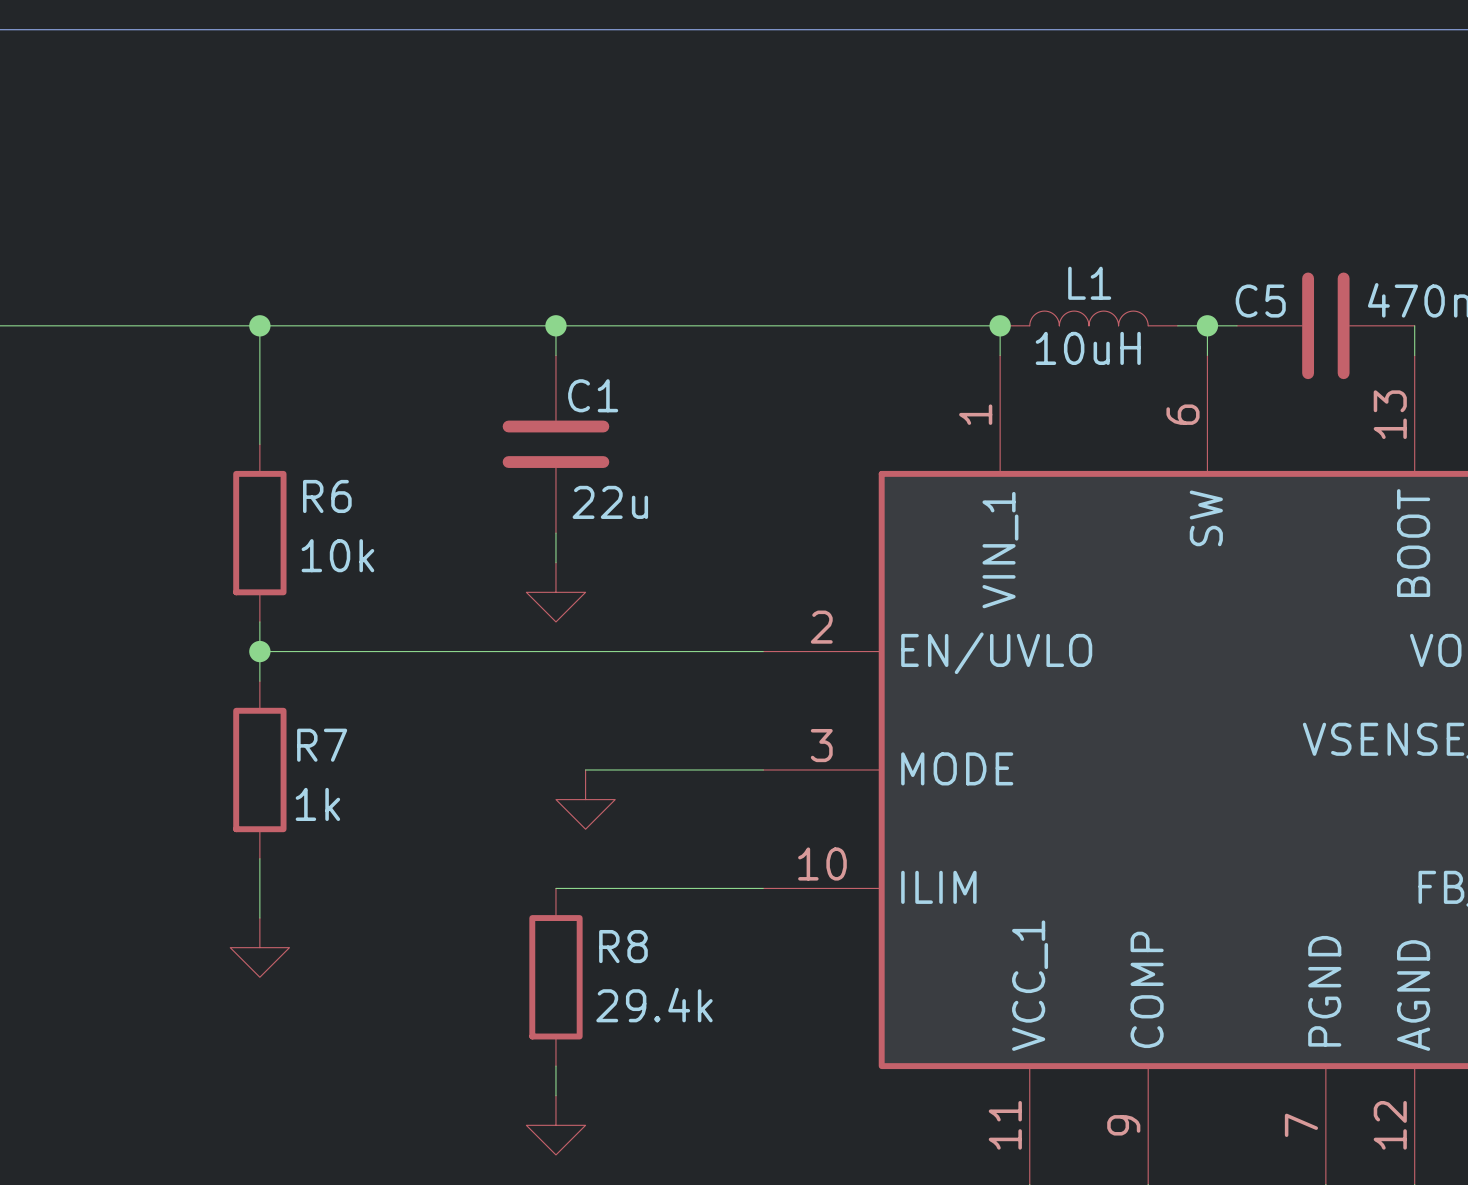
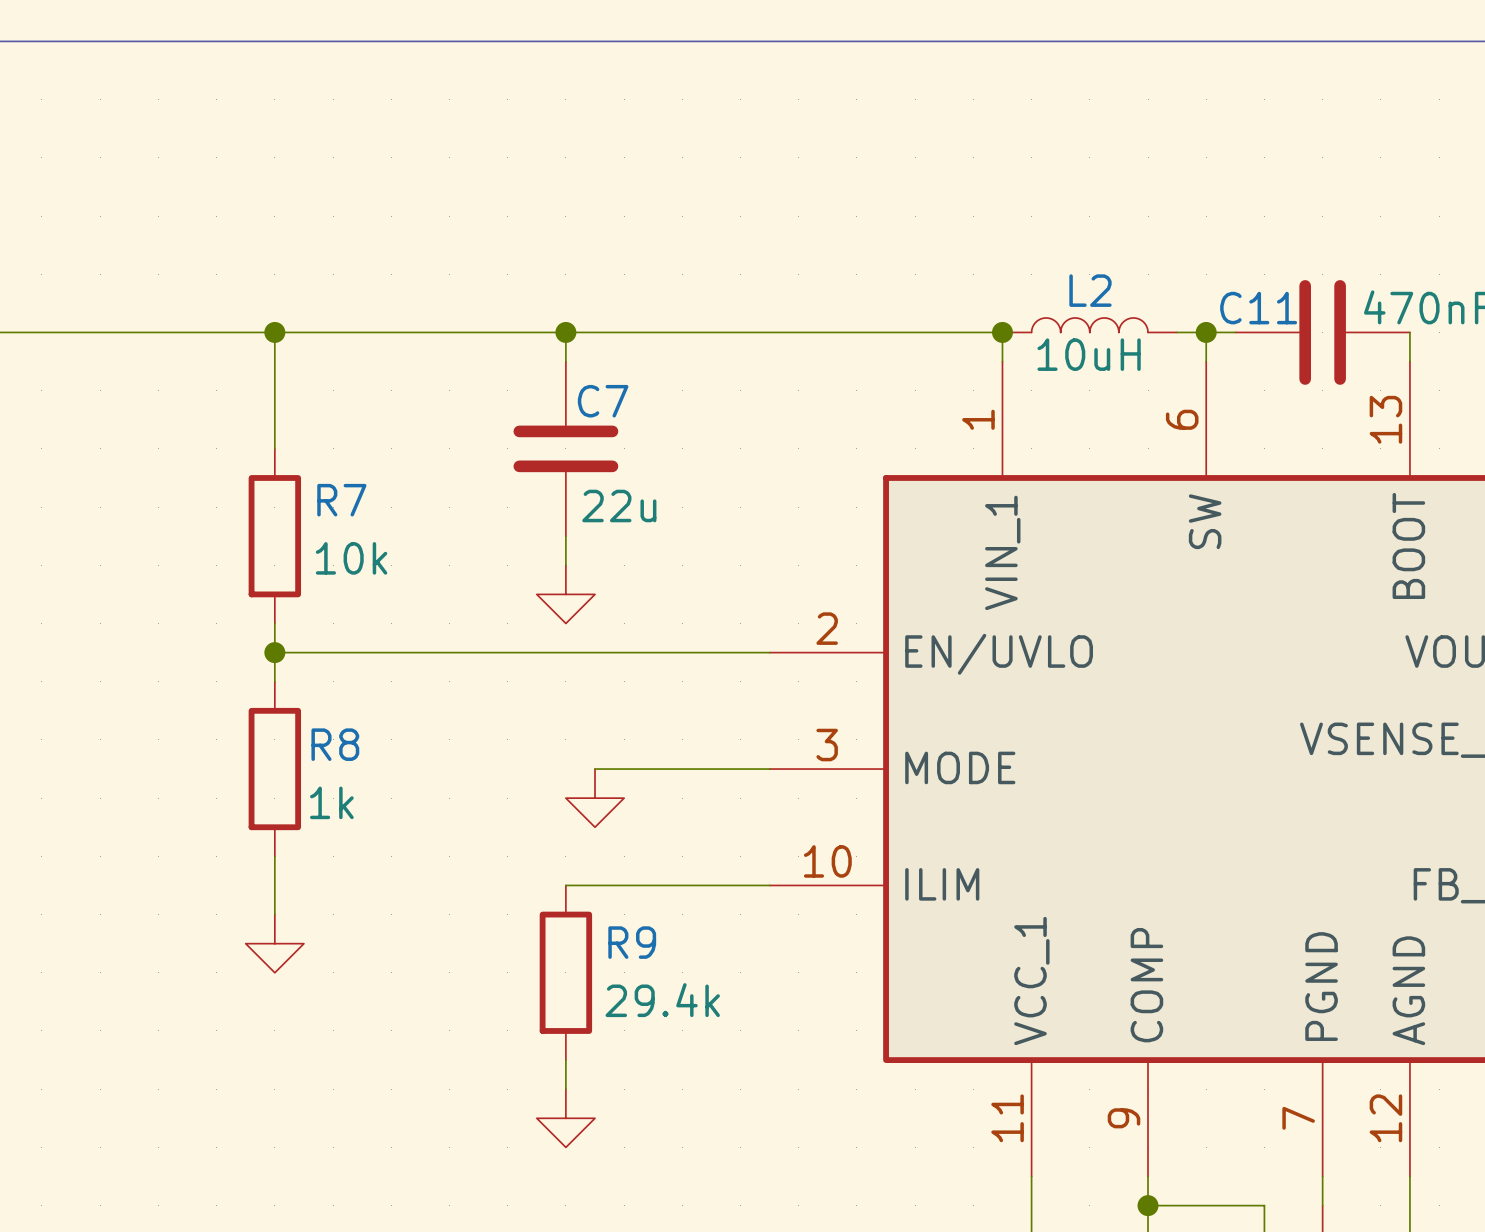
L1 name: L1 (1089, 283) -> L2 (1090, 290)
C5 name: C5 (1260, 301) -> C11 (1258, 308)
C1 name: C1 (593, 395) -> C7 (603, 401)
R6 name: R6 (327, 496) -> R7 (341, 500)
R7 name: R7 (322, 745) -> R8 (335, 744)
R8 name: R8 (623, 946) -> R9 (632, 942)

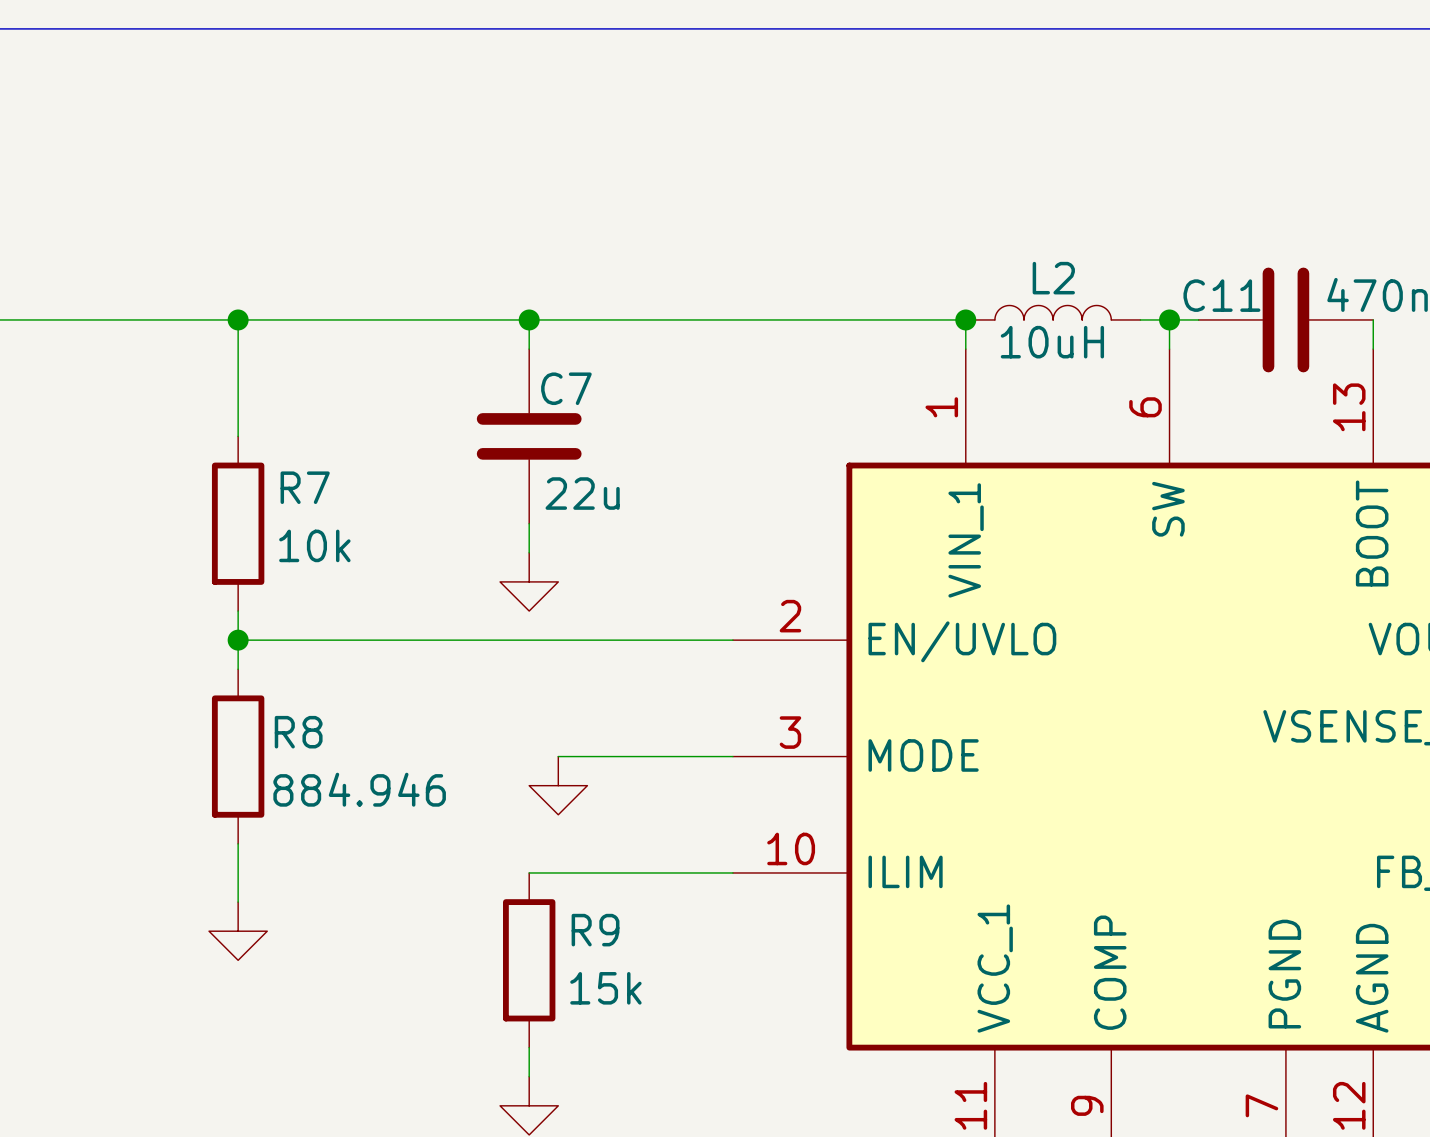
R8 value: 1k (331, 802) -> 884.946 (359, 789)
R9 value: 29.4k (662, 1000) -> 15k (605, 988)

